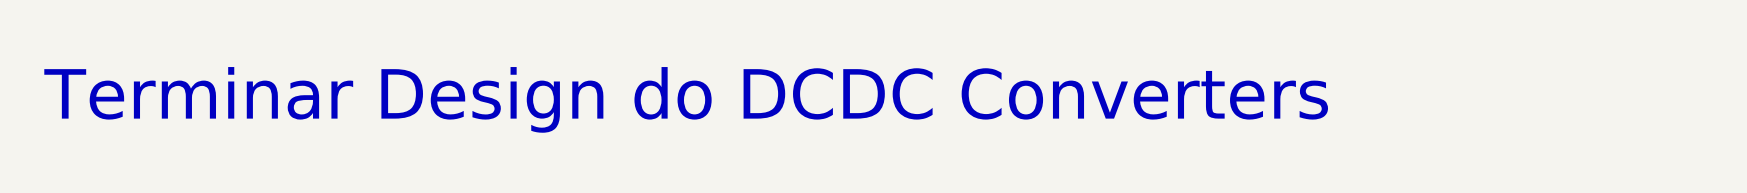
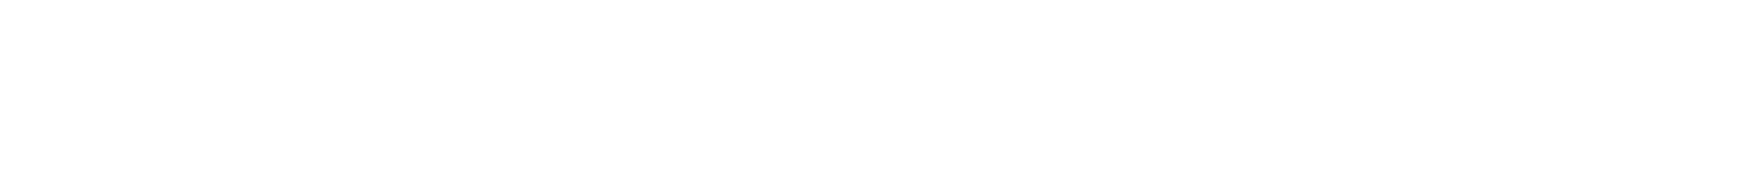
text: Terminar Design do DCDC Converters (686, 99) -> none

